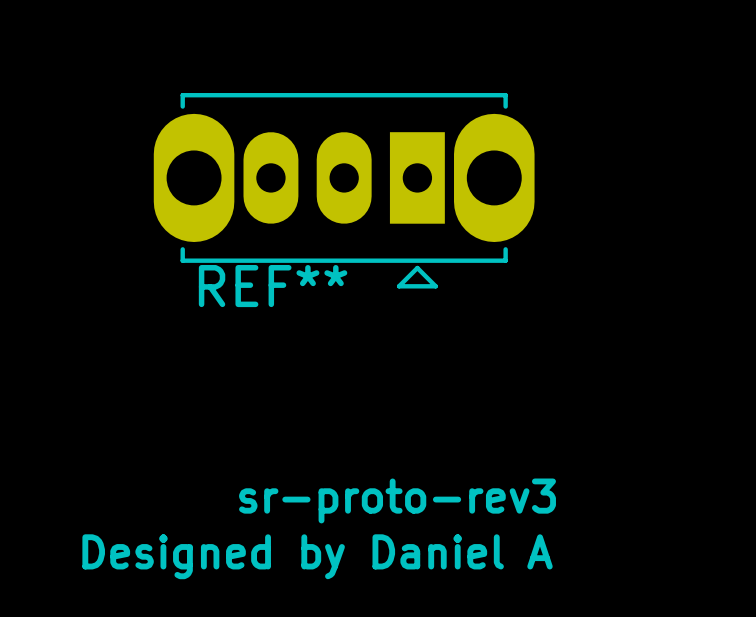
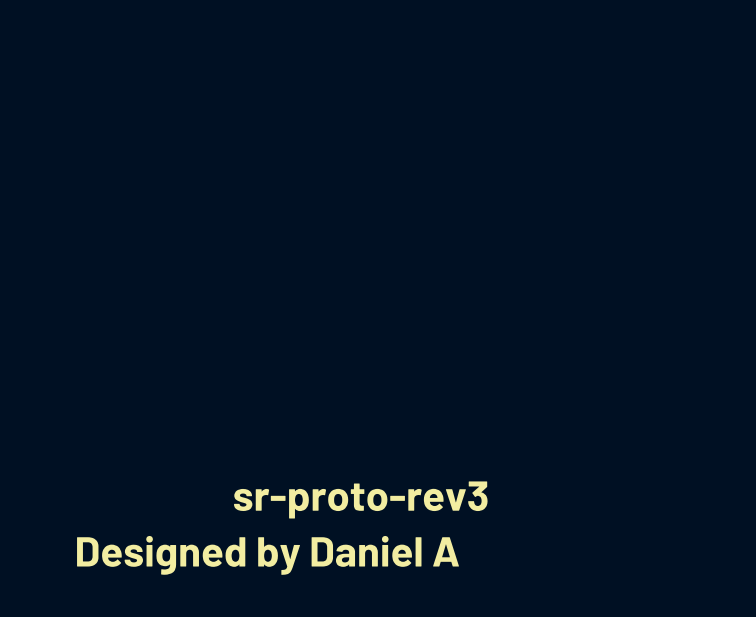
REF**: (344, 190) -> none

